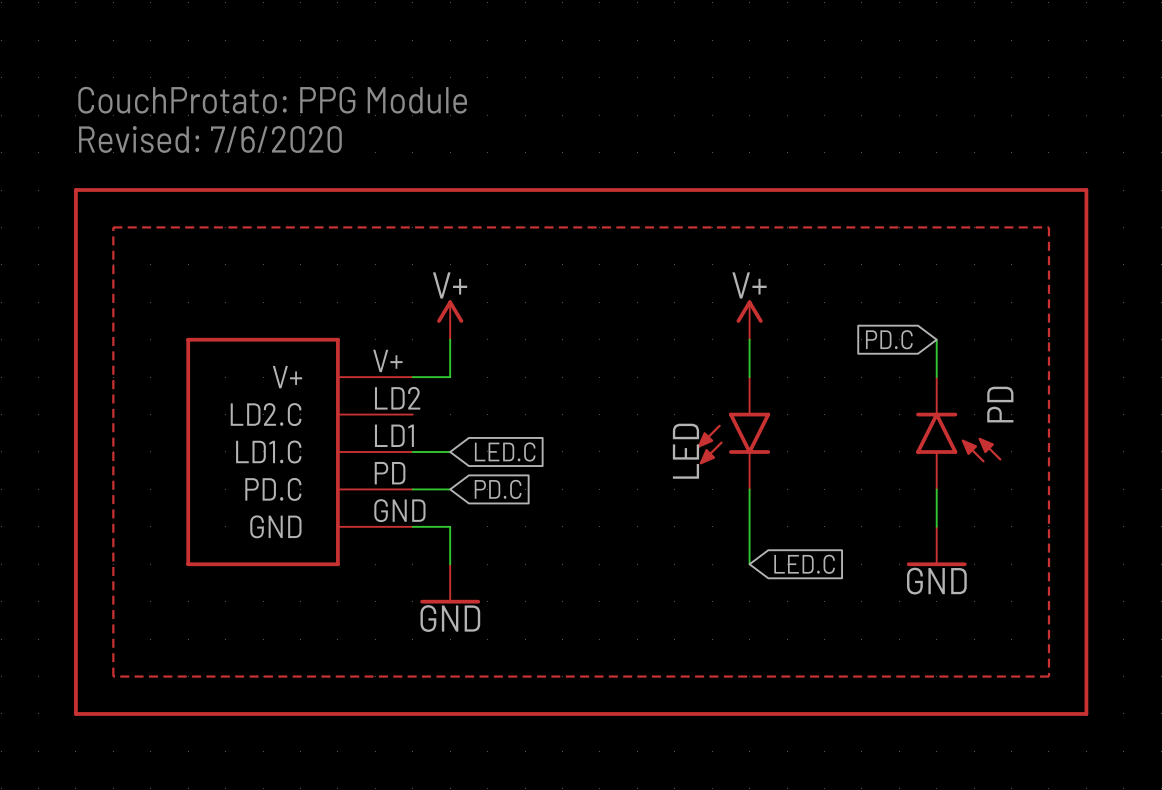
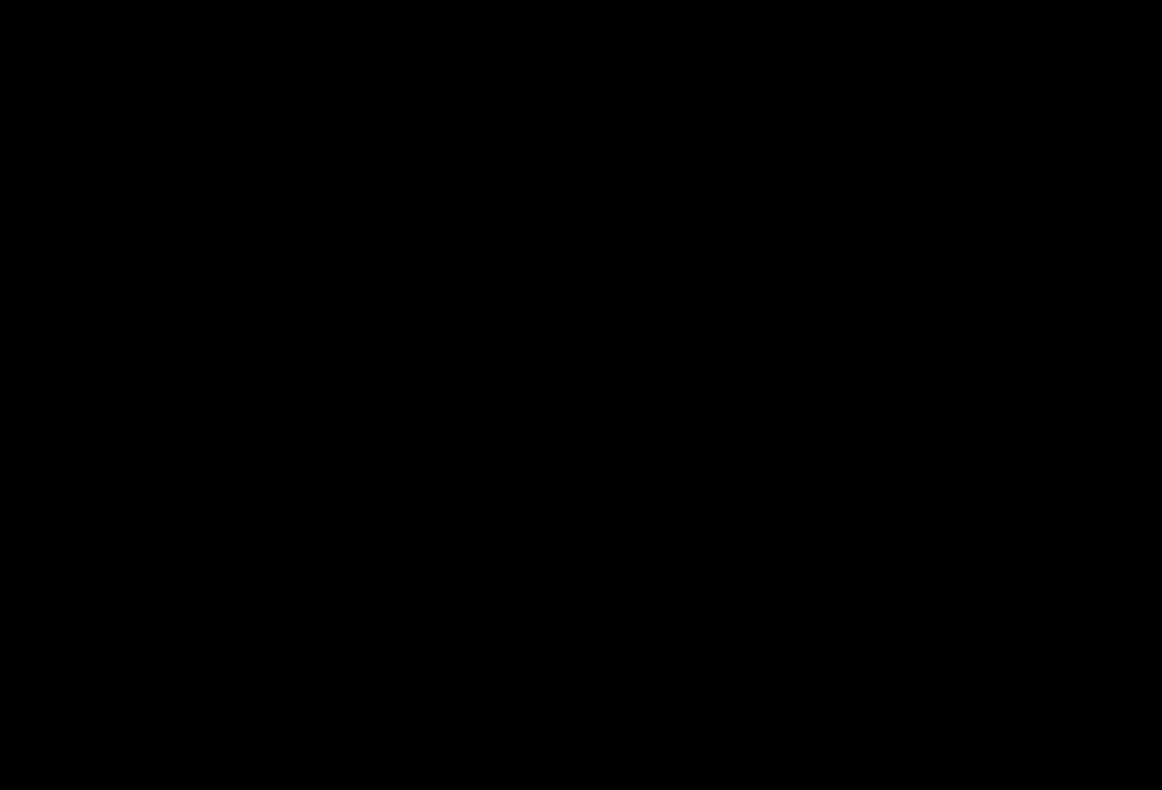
text: CouchProtato: PPG Module (272, 100) -> none
text: Revised: 7/6/2020 (210, 139) -> none
line: (75, 190) (75, 713) (1086, 713) (1086, 190) (75, 190) -> none
line: (113, 227) (113, 676) (1048, 676) (1048, 227) (113, 227) -> none
power symbol: V+ (450, 320) -> none
power symbol: V+ (749, 320) -> none
wire: (450, 339) (450, 377) (412, 377) -> none
wire: (749, 339) (749, 377) -> none
global label: PD.C (889, 339) -> none
wire: (936, 339) (936, 377) -> none
LED: (734, 433) -> none
PD: (958, 433) -> none
part: (299, 451) -> none
wire: (412, 451) (450, 451) -> none
global label: LED.C (505, 452) -> none
wire: (412, 489) (450, 489) -> none
global label: PD.C (498, 489) -> none
wire: (749, 489) (749, 564) -> none
wire: (936, 489) (936, 526) -> none
wire: (412, 526) (450, 526) (450, 564) -> none
power symbol: GND (936, 546) -> none
global label: LED.C (804, 564) -> none
power symbol: GND (450, 583) -> none

